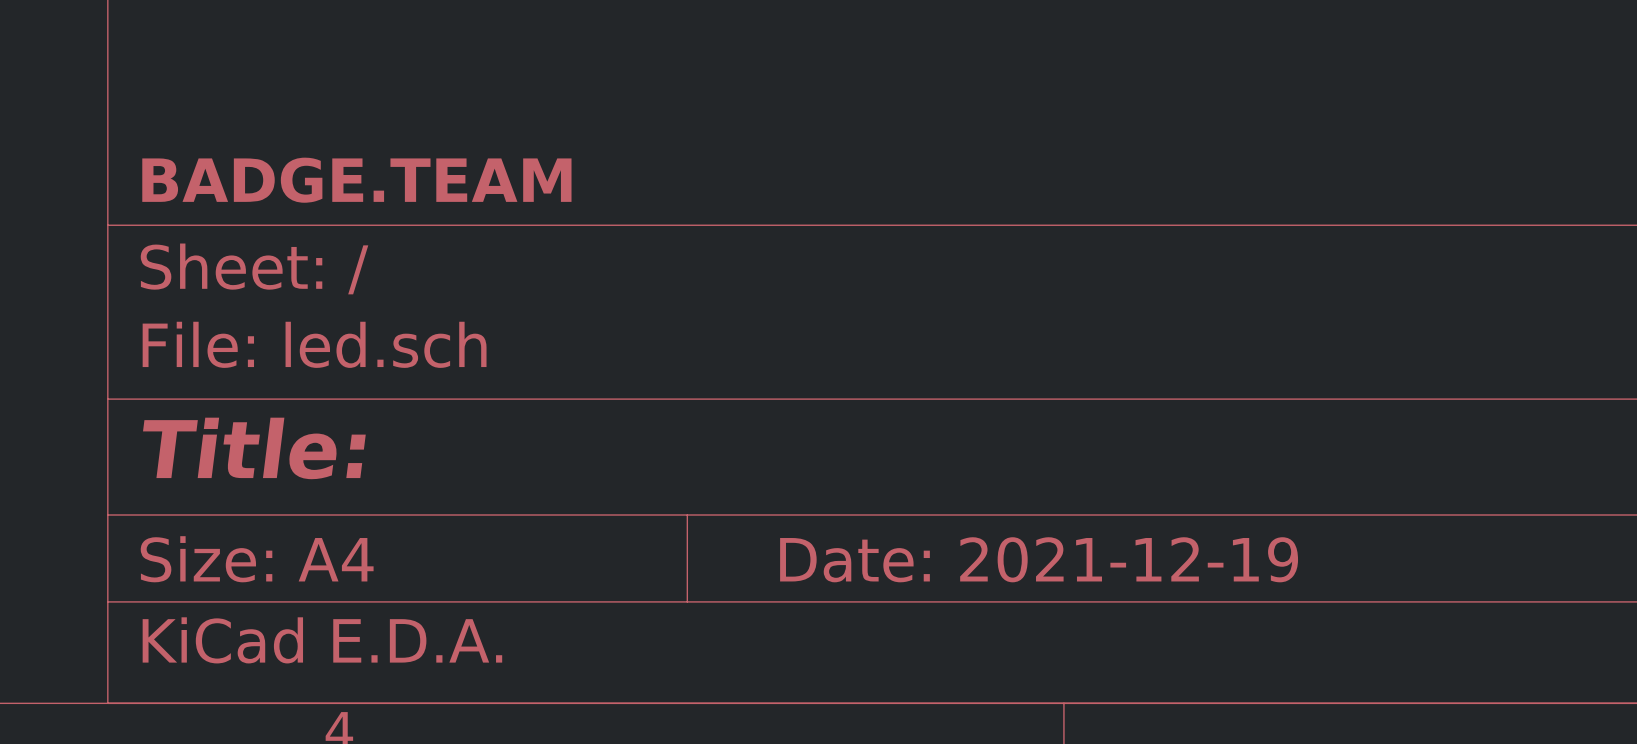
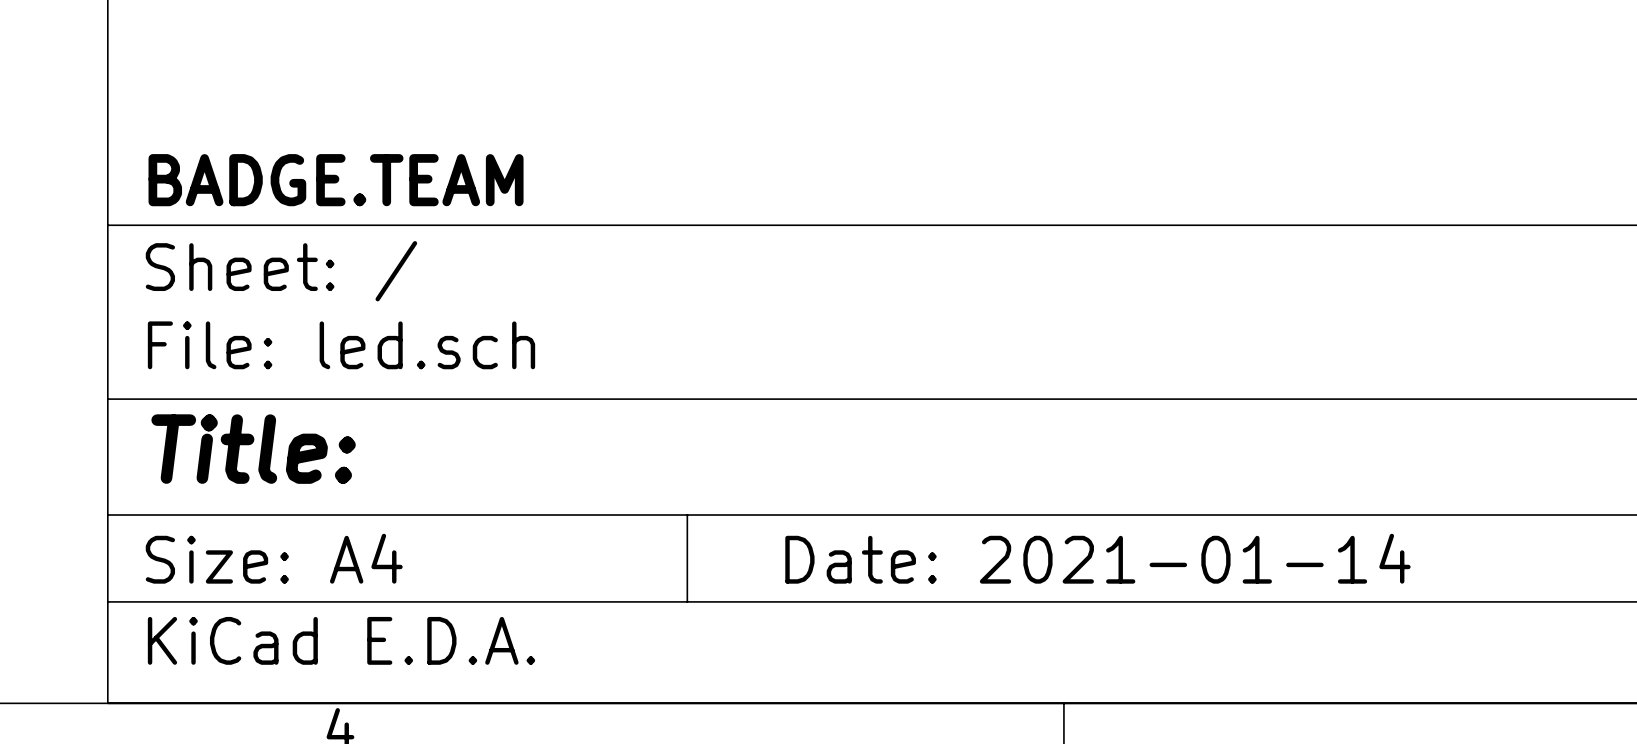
title block: Date: 2021-12-19 (1039, 559) -> Date: 2021-01-14 (1097, 558)

